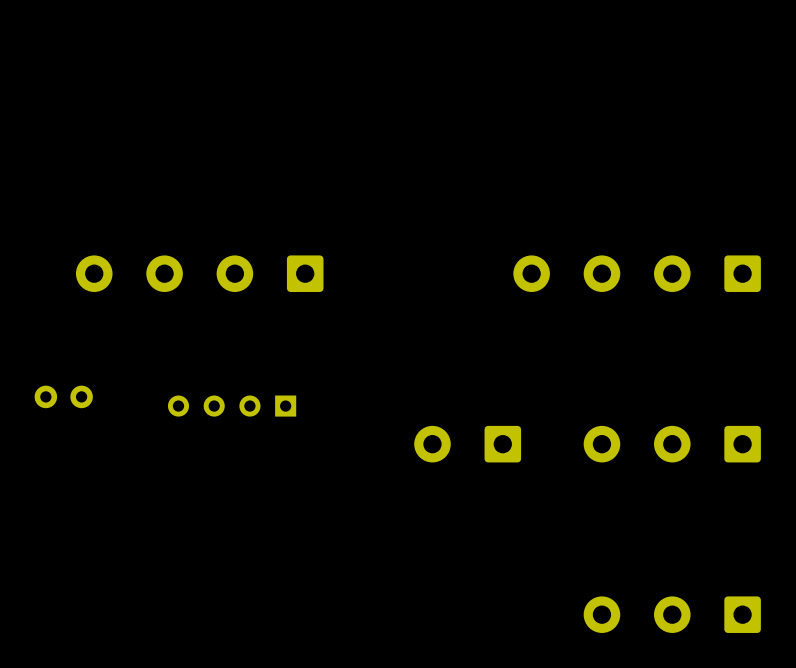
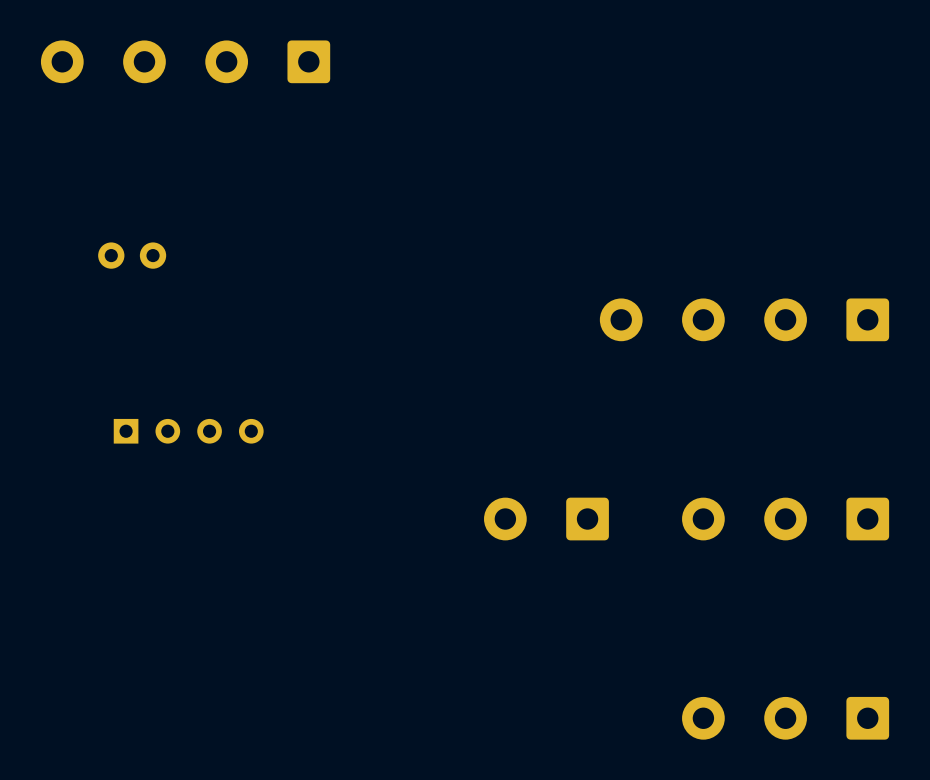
part position: (199, 273) -> (185, 61)
part position: (63, 396) -> (132, 255)
part rotation: 0° (232, 406) -> 180° (188, 431)
part position: (232, 406) -> (188, 431)

